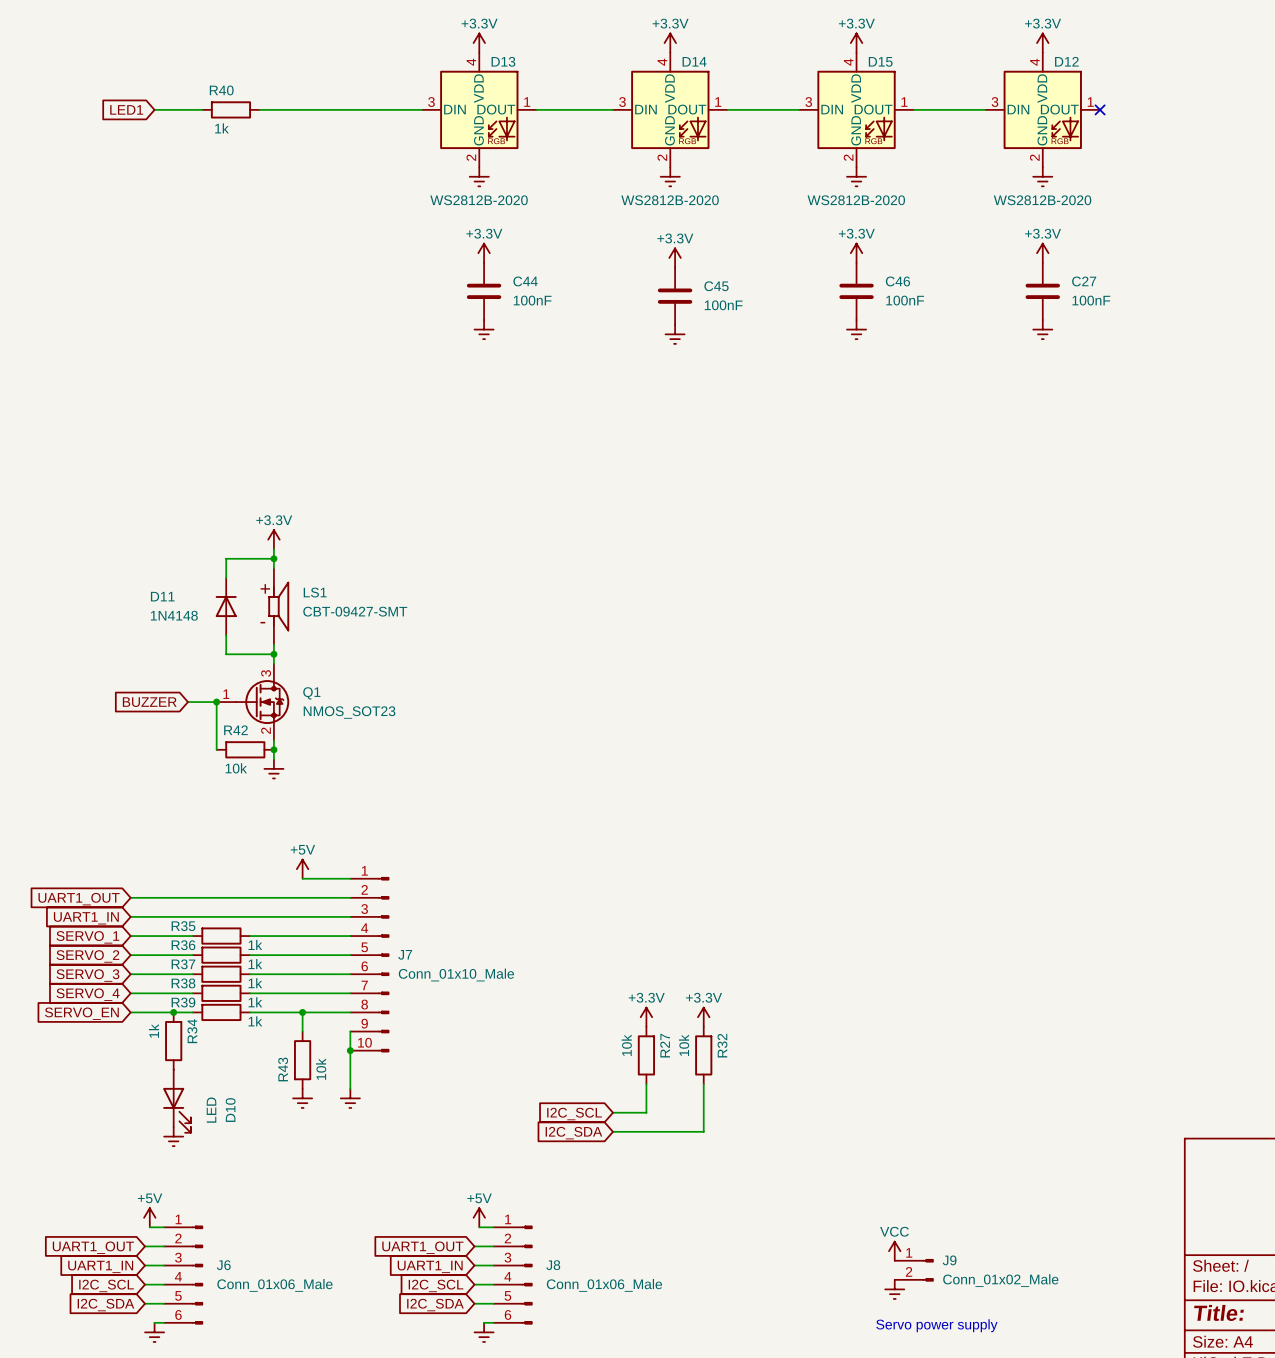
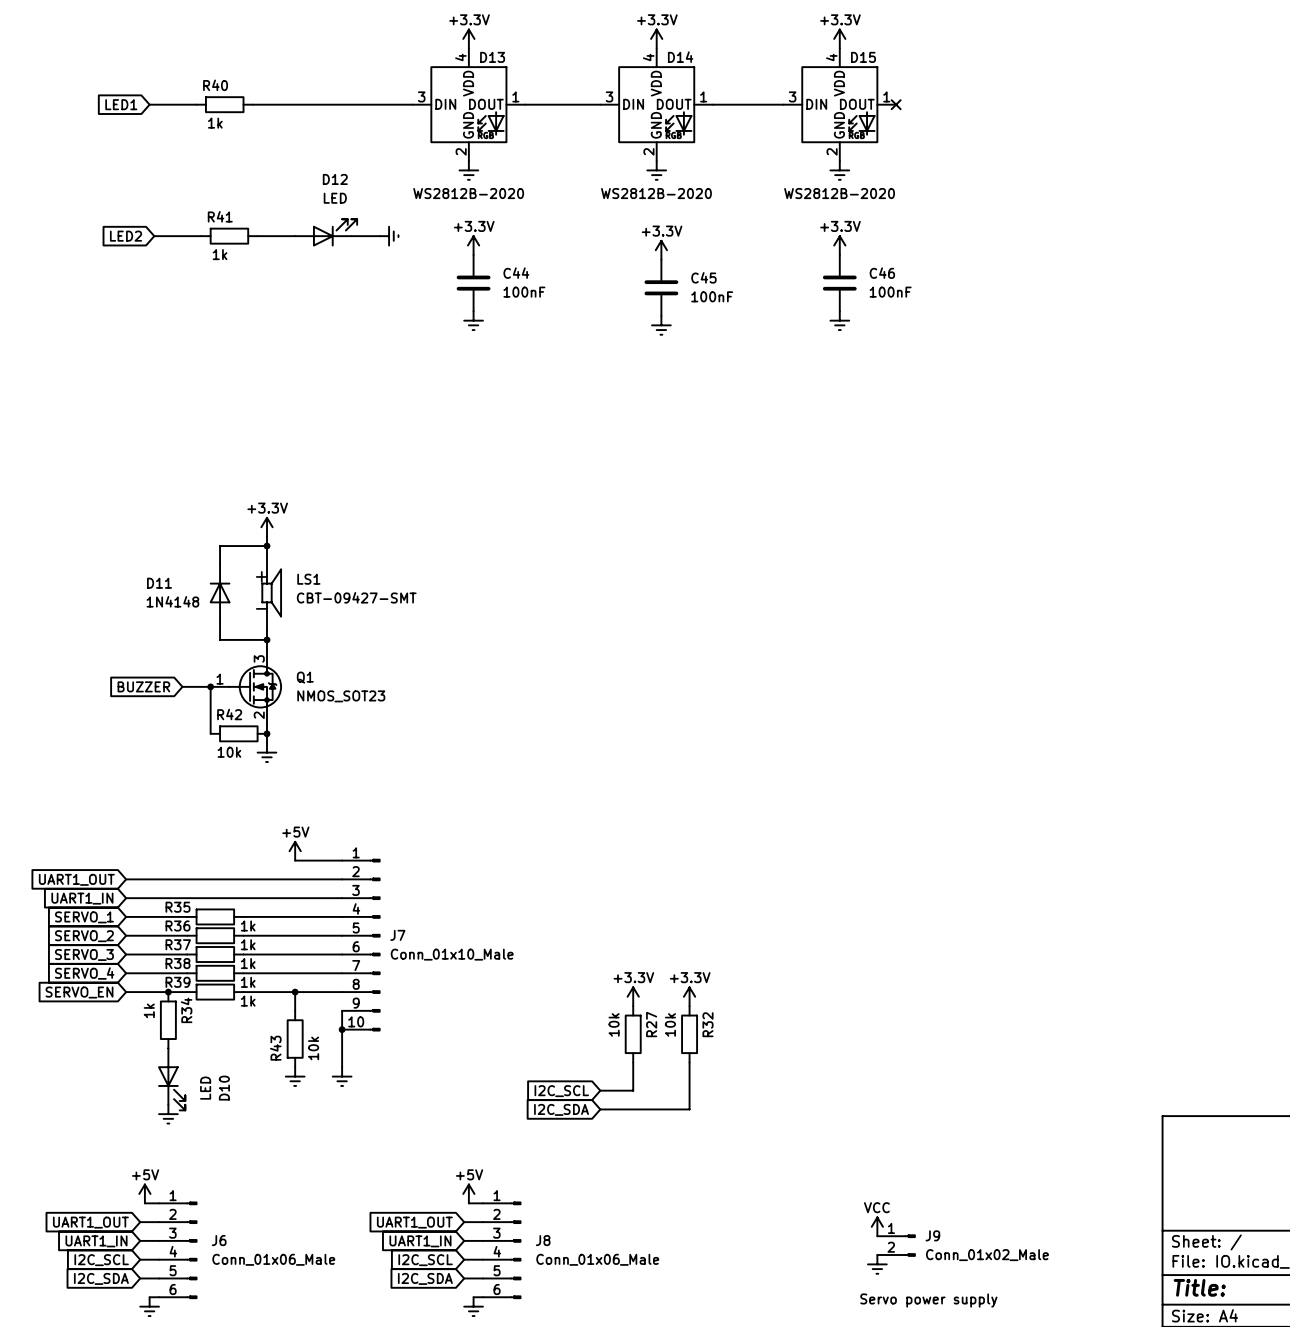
power symbol: +3.3V (1042, 43) -> none
D12 symbol: [985, 52, 1101, 168] -> [295, 219, 358, 247]
D12 name position: D12 (1066, 61) -> D12 (335, 179)
wire: (913, 109) (985, 109) -> none
no-connect mark: none -> (896, 104)
no-connect mark: (1100, 109) -> none
power symbol: (1042, 176) -> none
D12 value: WS2812B-2020 (1042, 200) -> LED (335, 198)
global label: none -> LED2 (126, 236)
wire: none -> (154, 236) (201, 236)
R41: none -> 1k (229, 236)
wire: none -> (257, 236) (295, 236)
wire: none -> (351, 236) (379, 236)
power symbol: none -> (389, 236)
power symbol: +3.3V (1042, 253) -> none
C27: 100nF (1042, 291) -> none
power symbol: (1042, 329) -> none

